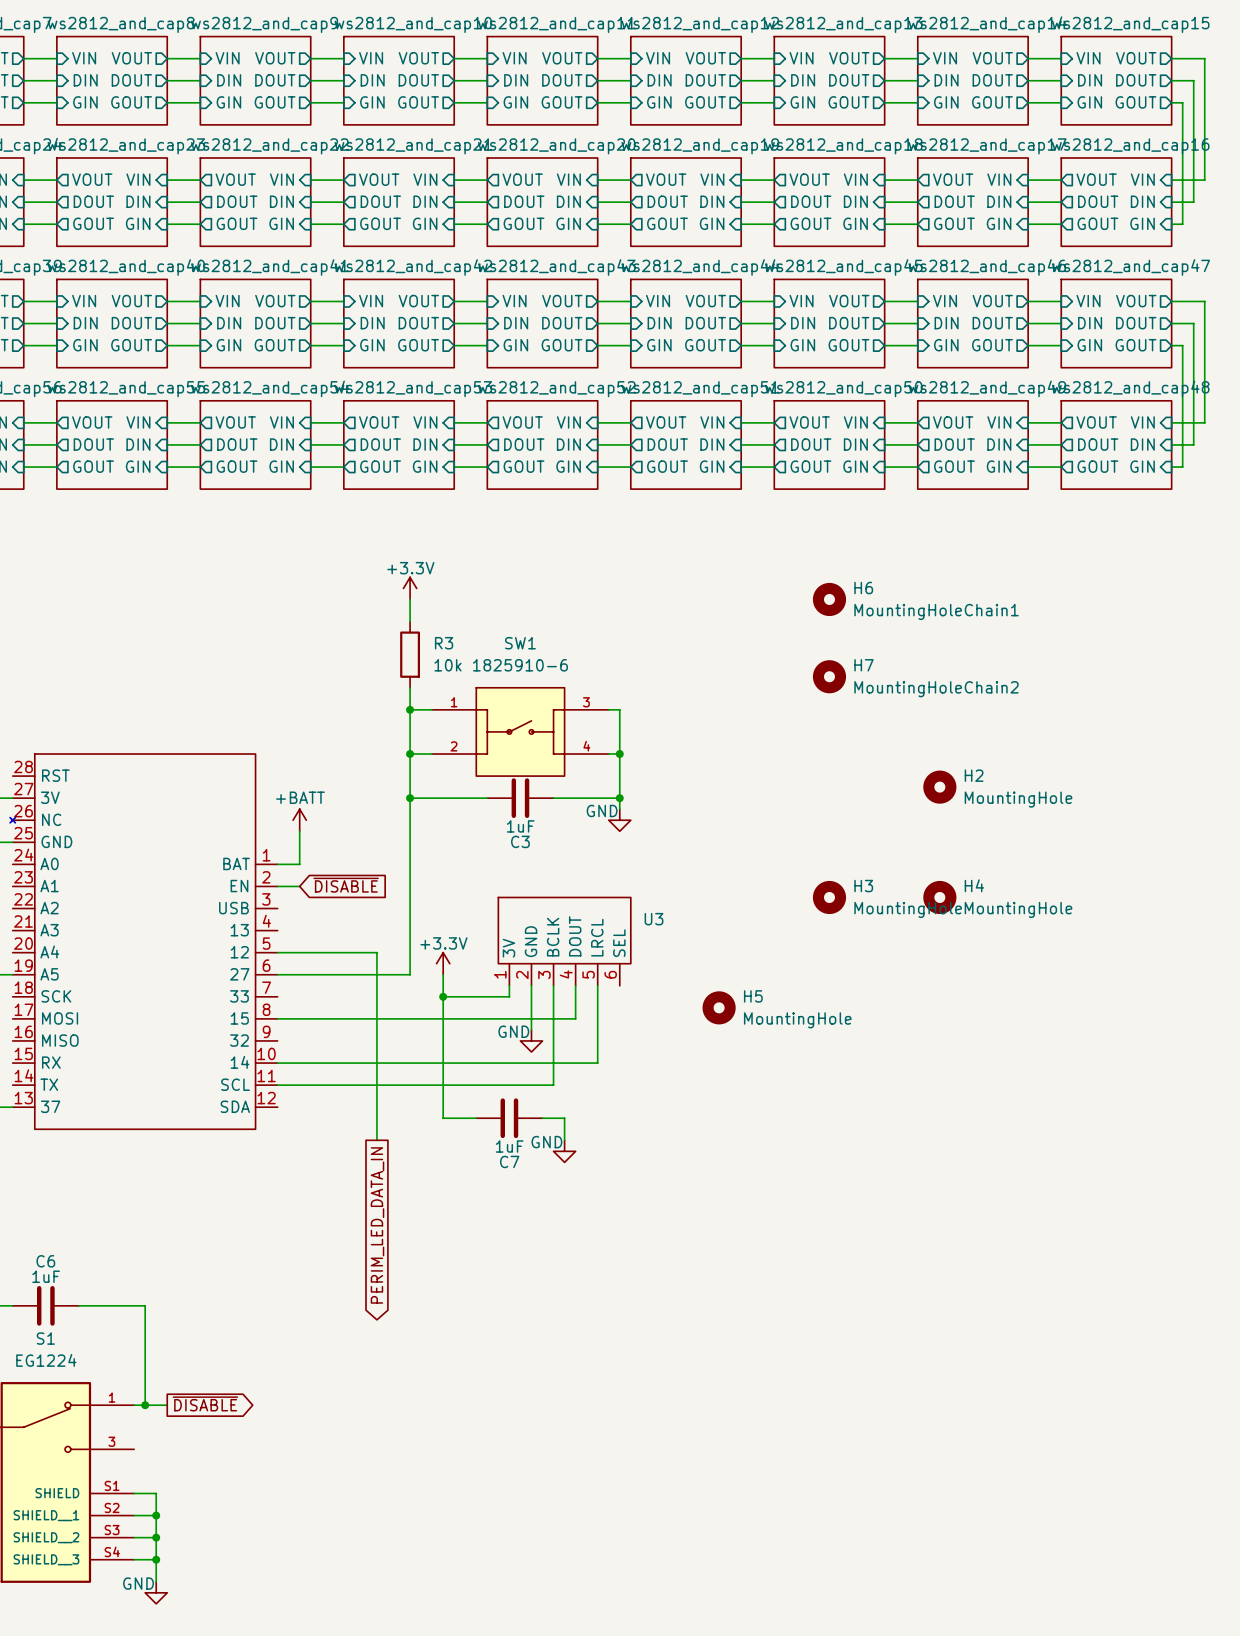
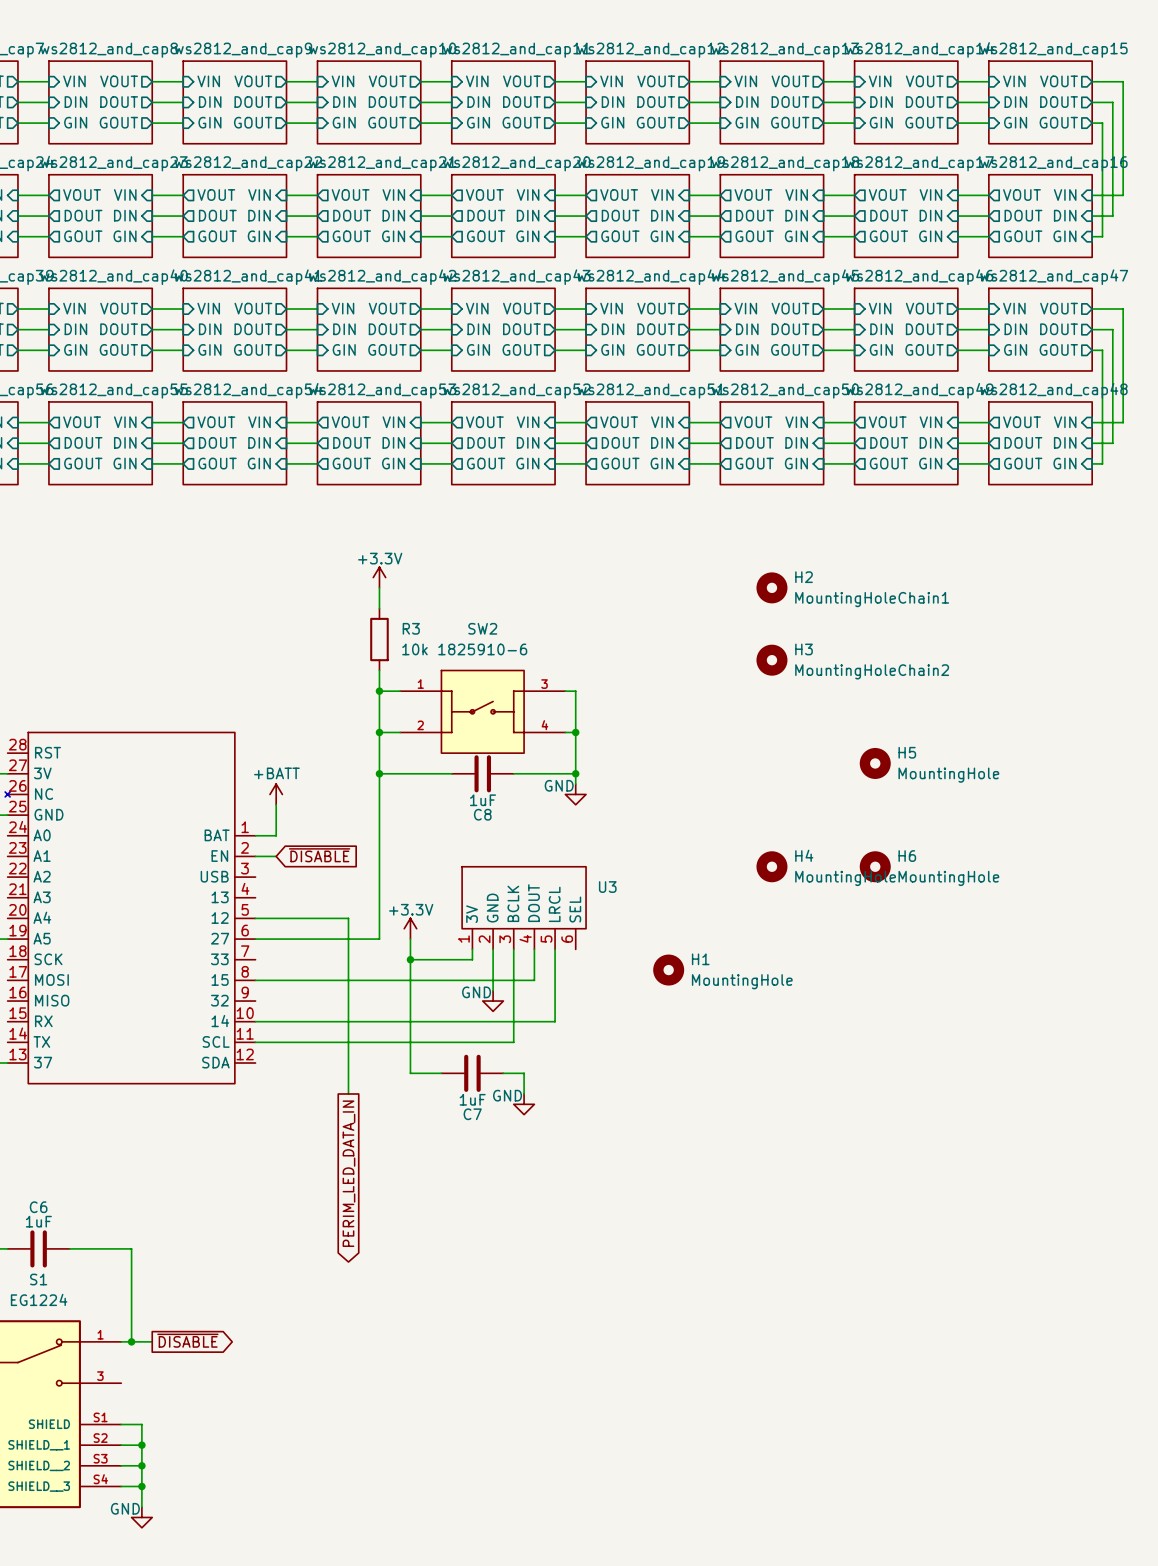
H6 name: H6 (863, 588) -> H2 (804, 577)
SW1 name: SW1 (520, 643) -> SW2 (482, 628)
H7 name: H7 (863, 665) -> H3 (804, 649)
H2 name: H2 (974, 775) -> H5 (907, 752)
C3 name: C3 (520, 841) -> C8 (482, 814)
H4 name: H4 (974, 885) -> H6 (907, 856)
H3 name: H3 (863, 886) -> H4 (804, 855)
H5 name: H5 (753, 996) -> H1 (700, 959)

